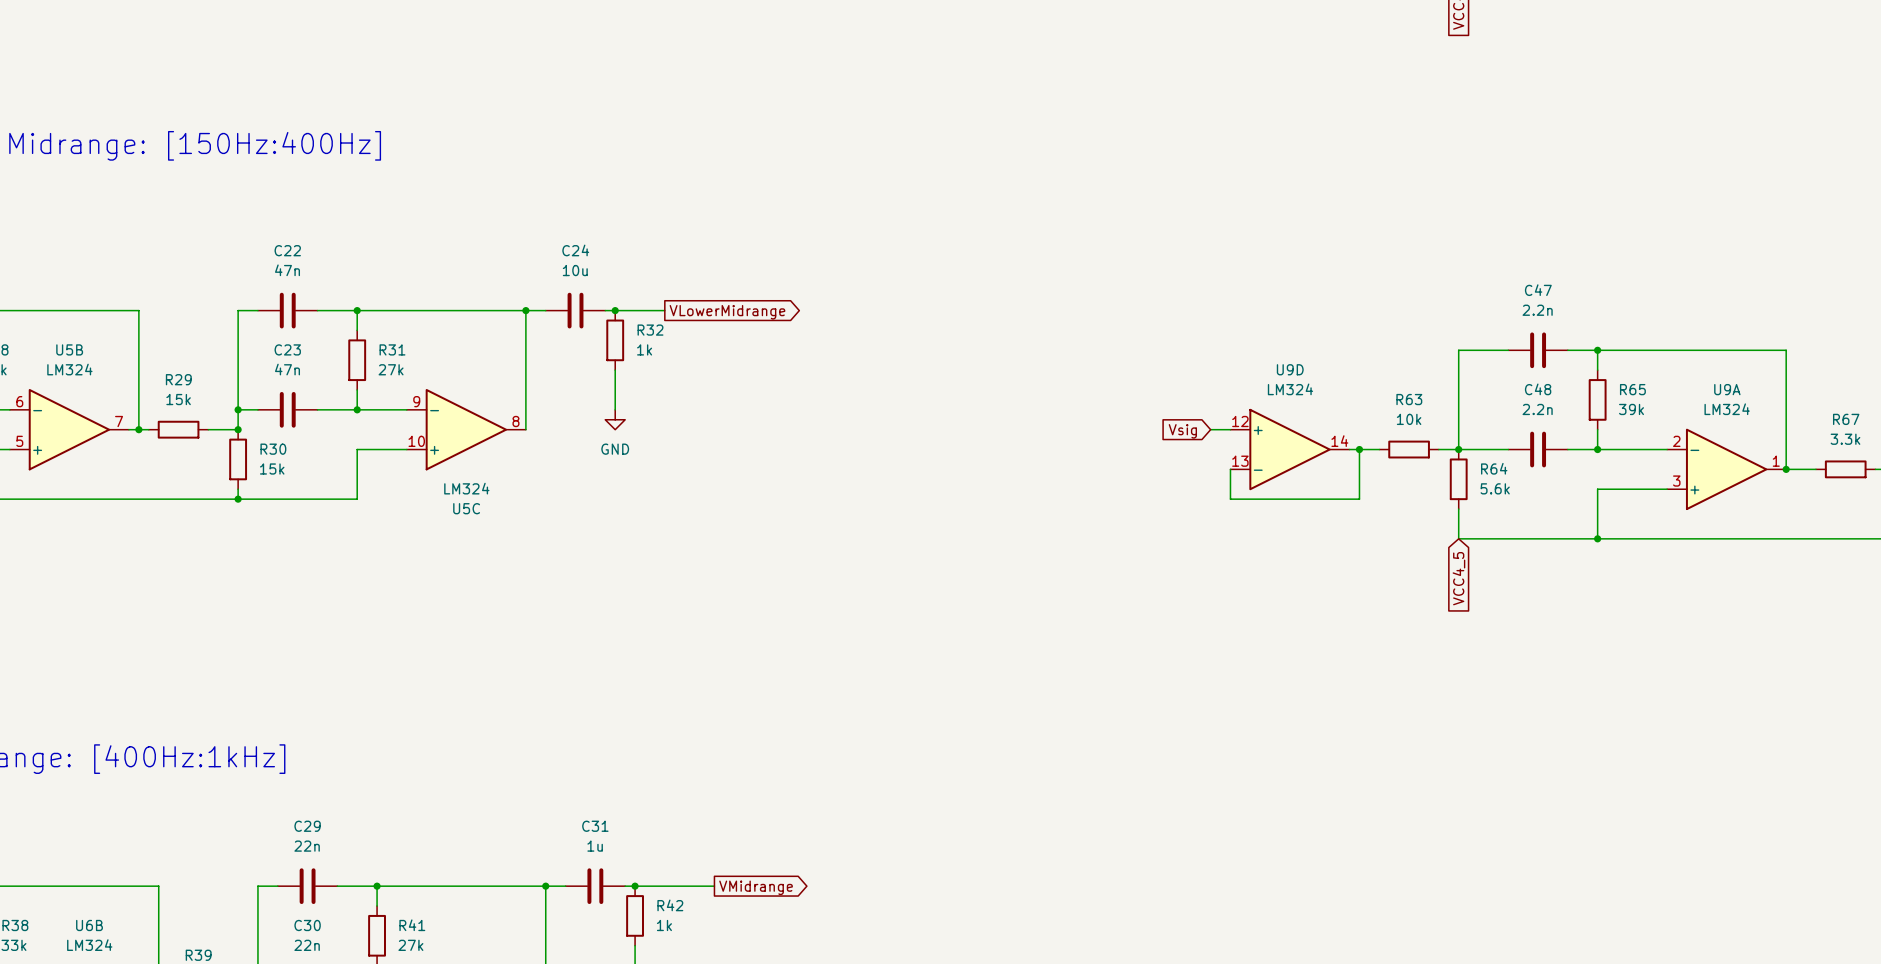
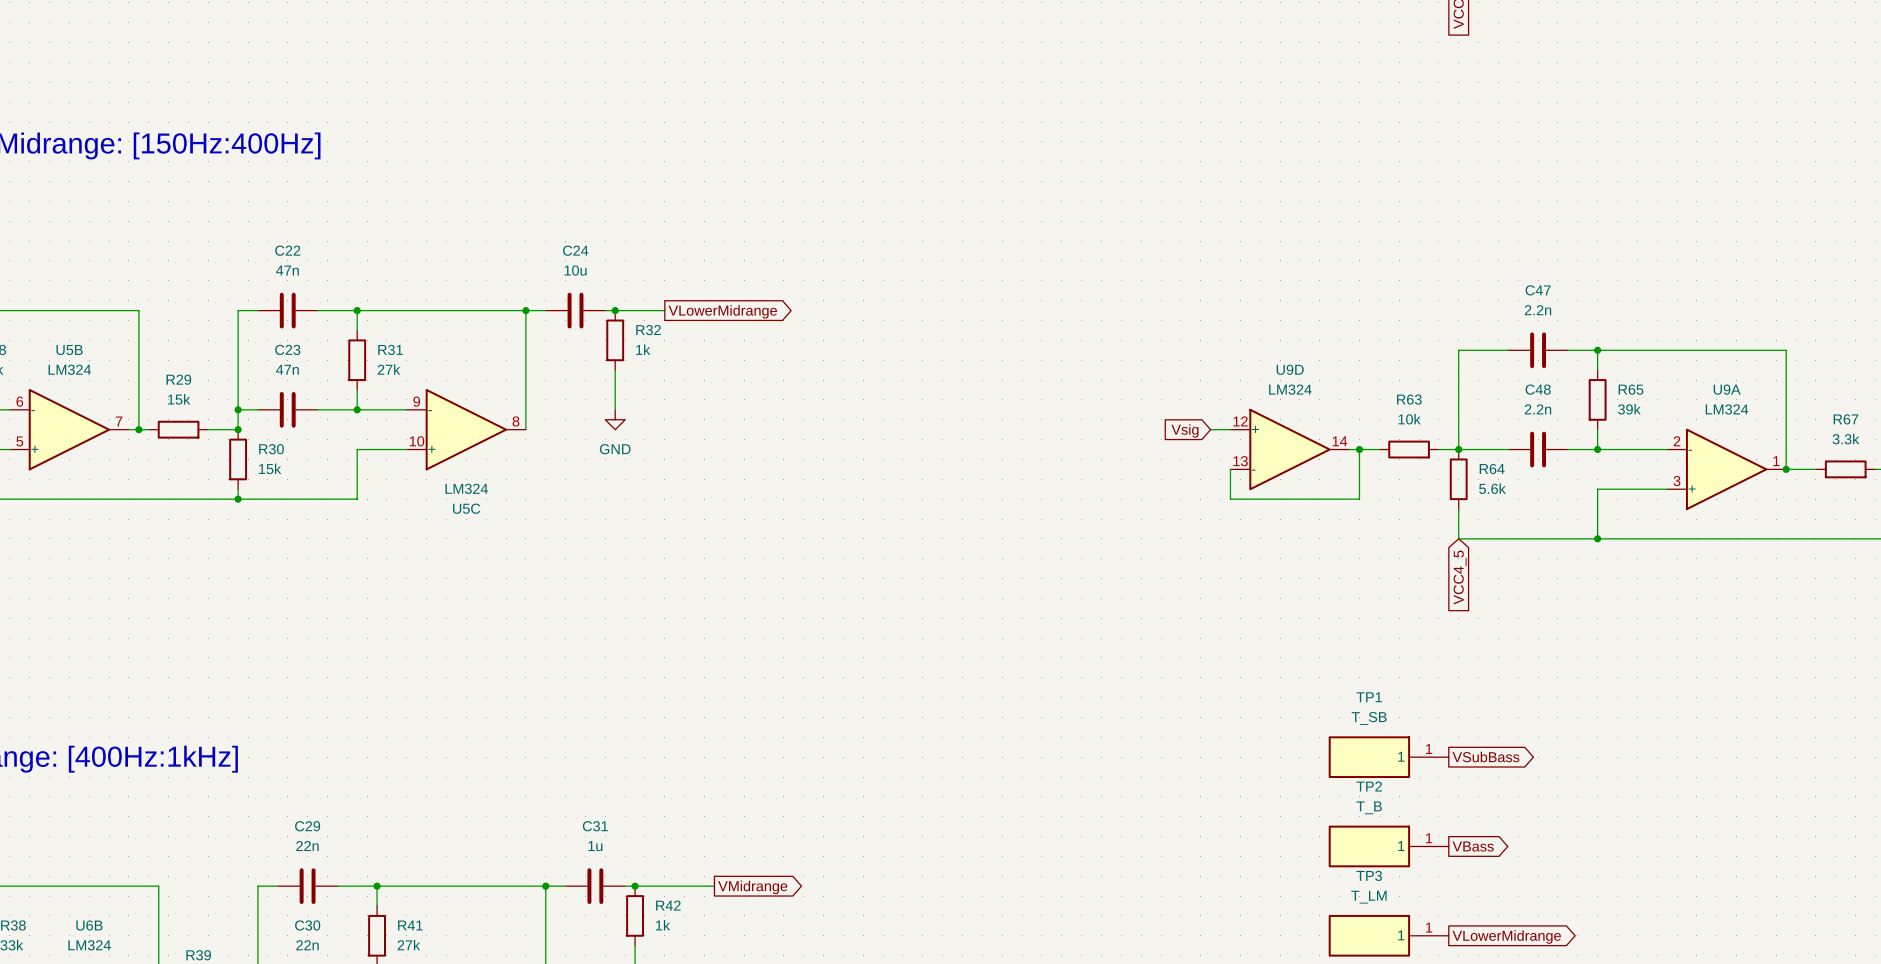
TP1: none -> T_SB (1388, 757)
global label: none -> VSubBass (1485, 756)
TP2: none -> T_B (1388, 846)
global label: none -> VBass (1473, 846)
TP3: none -> T_LM (1388, 935)
global label: none -> VLowerMidrange (1506, 937)

